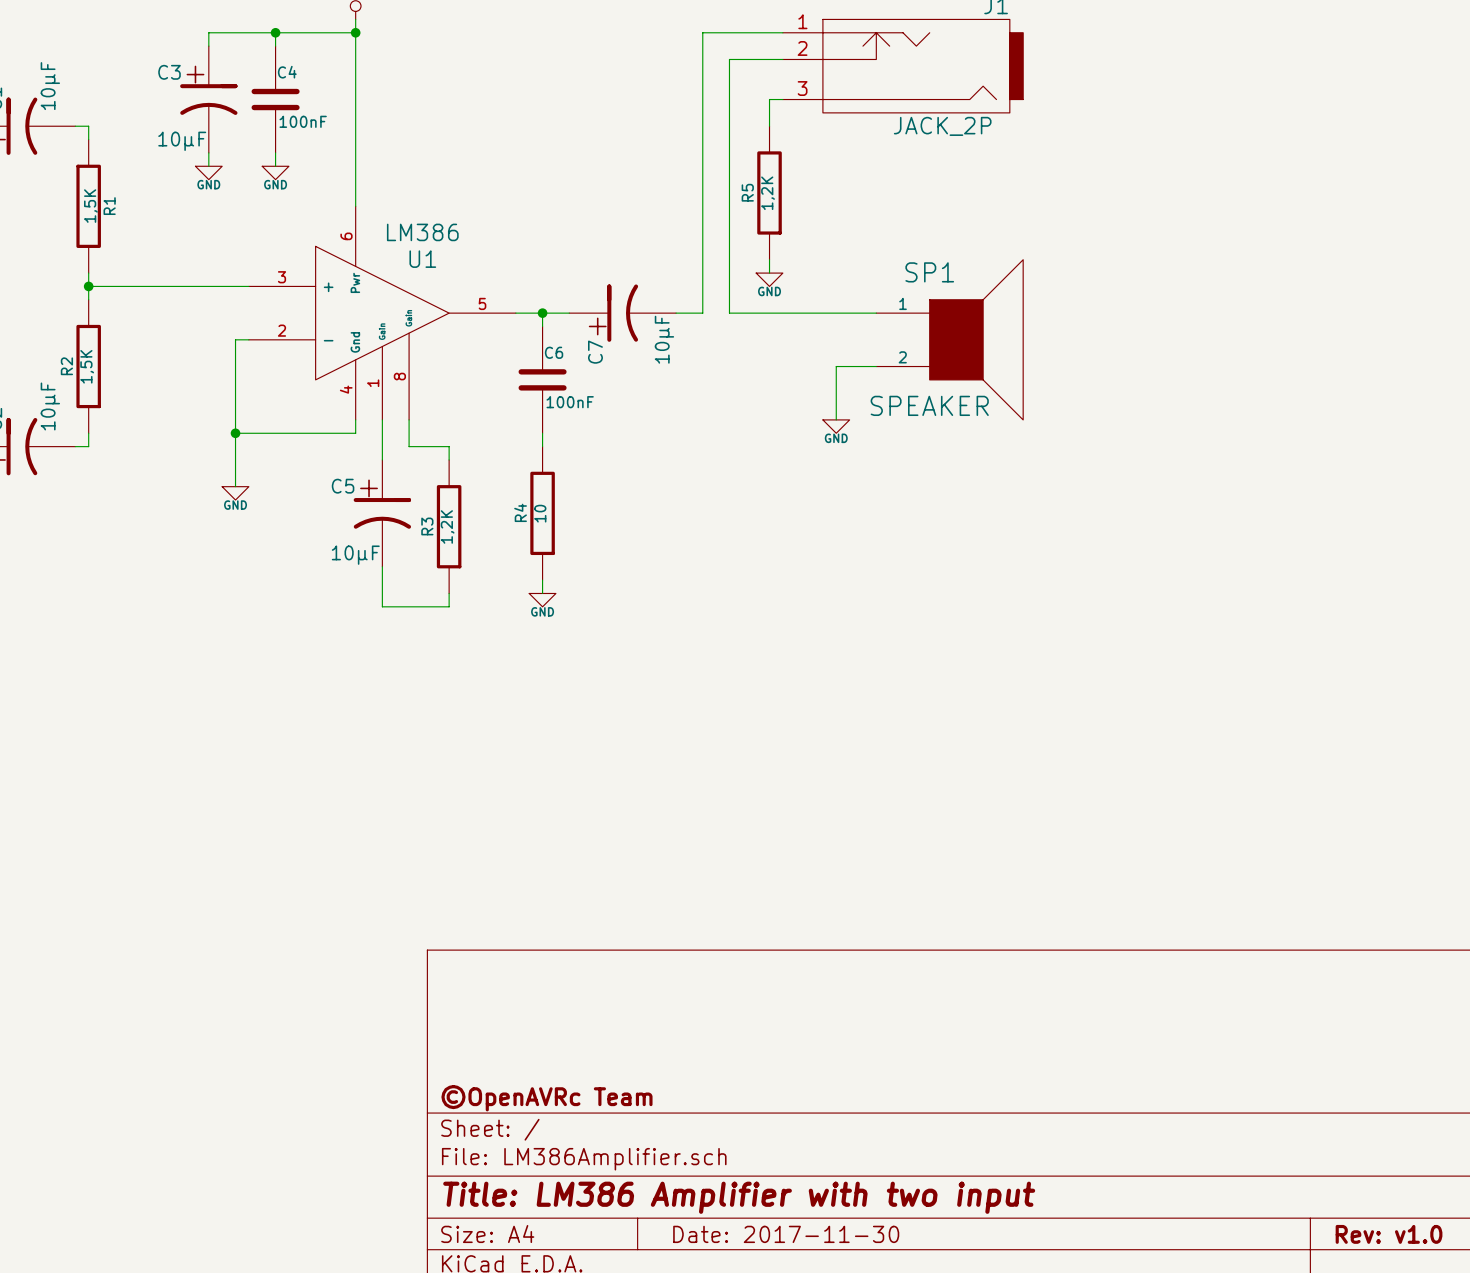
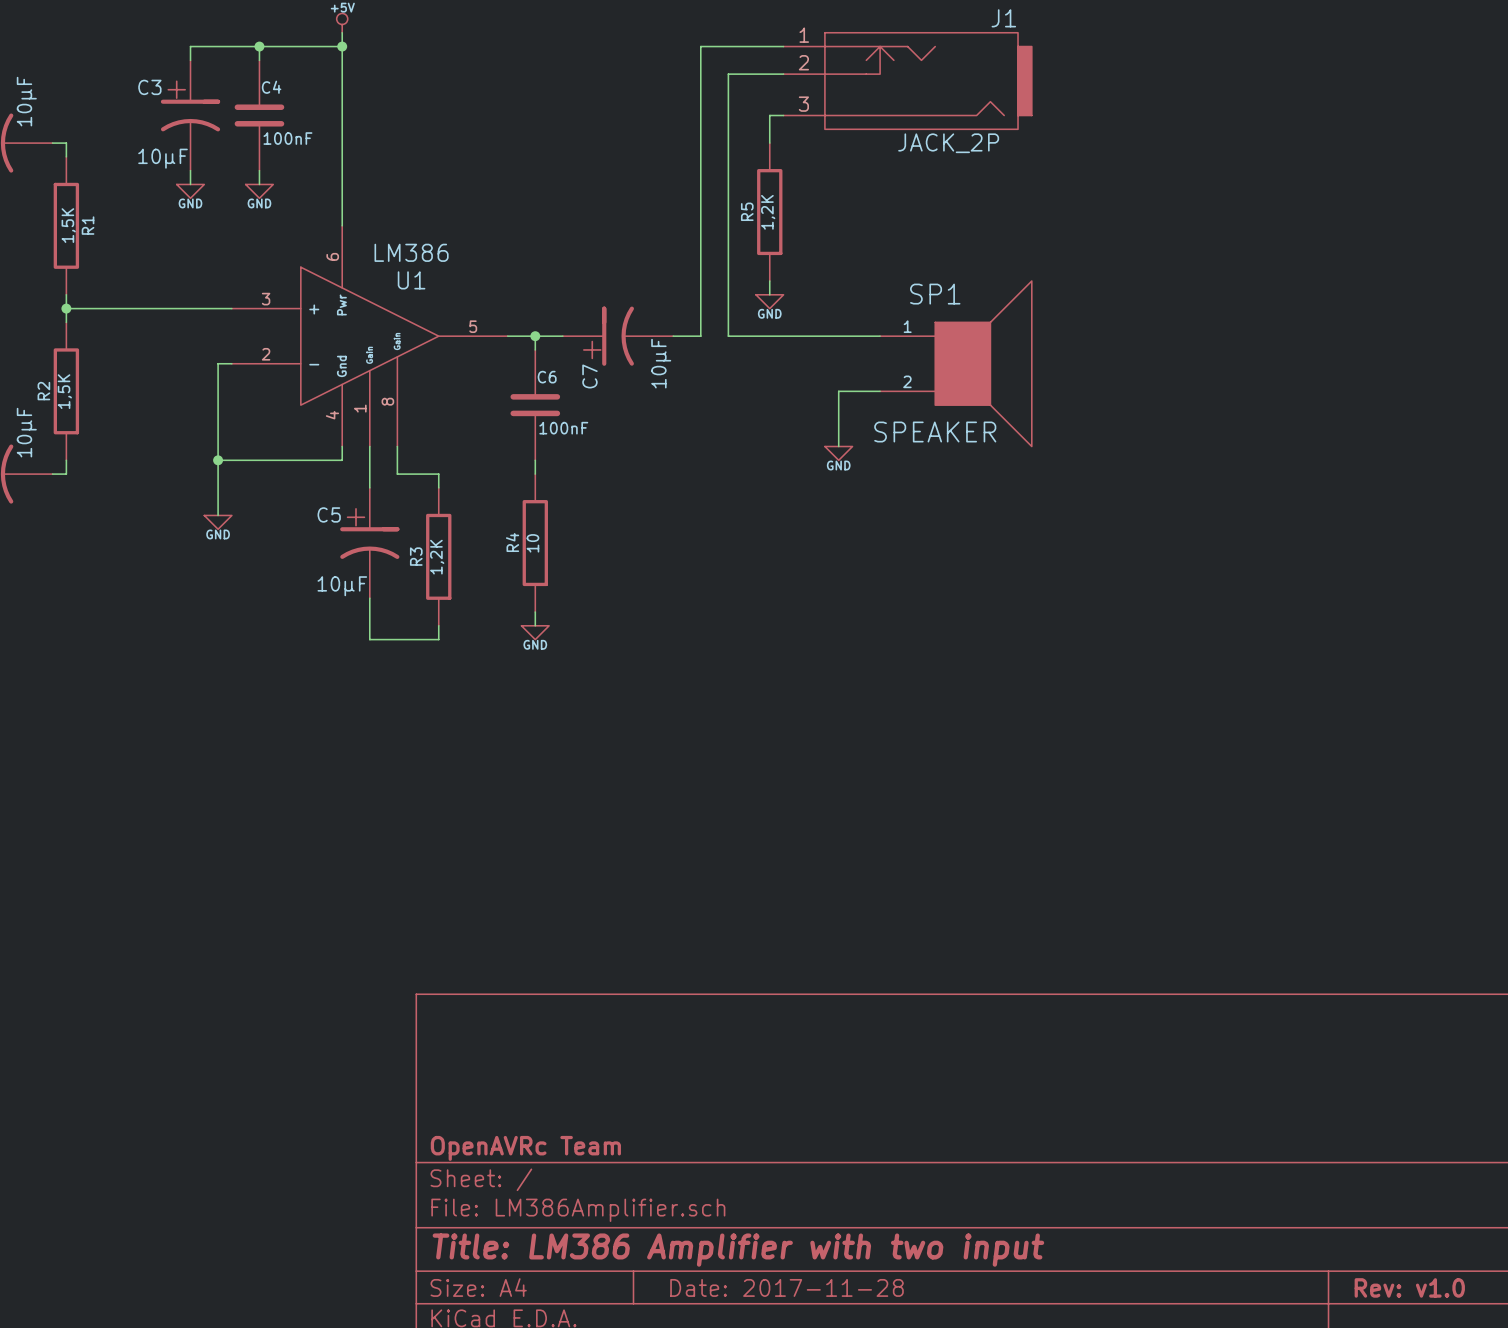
title block: ©OpenAVRc Team (546, 1098) -> OpenAVRc Team (525, 1148)
title block: Date: 2017-11-30 (786, 1234) -> Date: 2017-11-28 (787, 1287)

